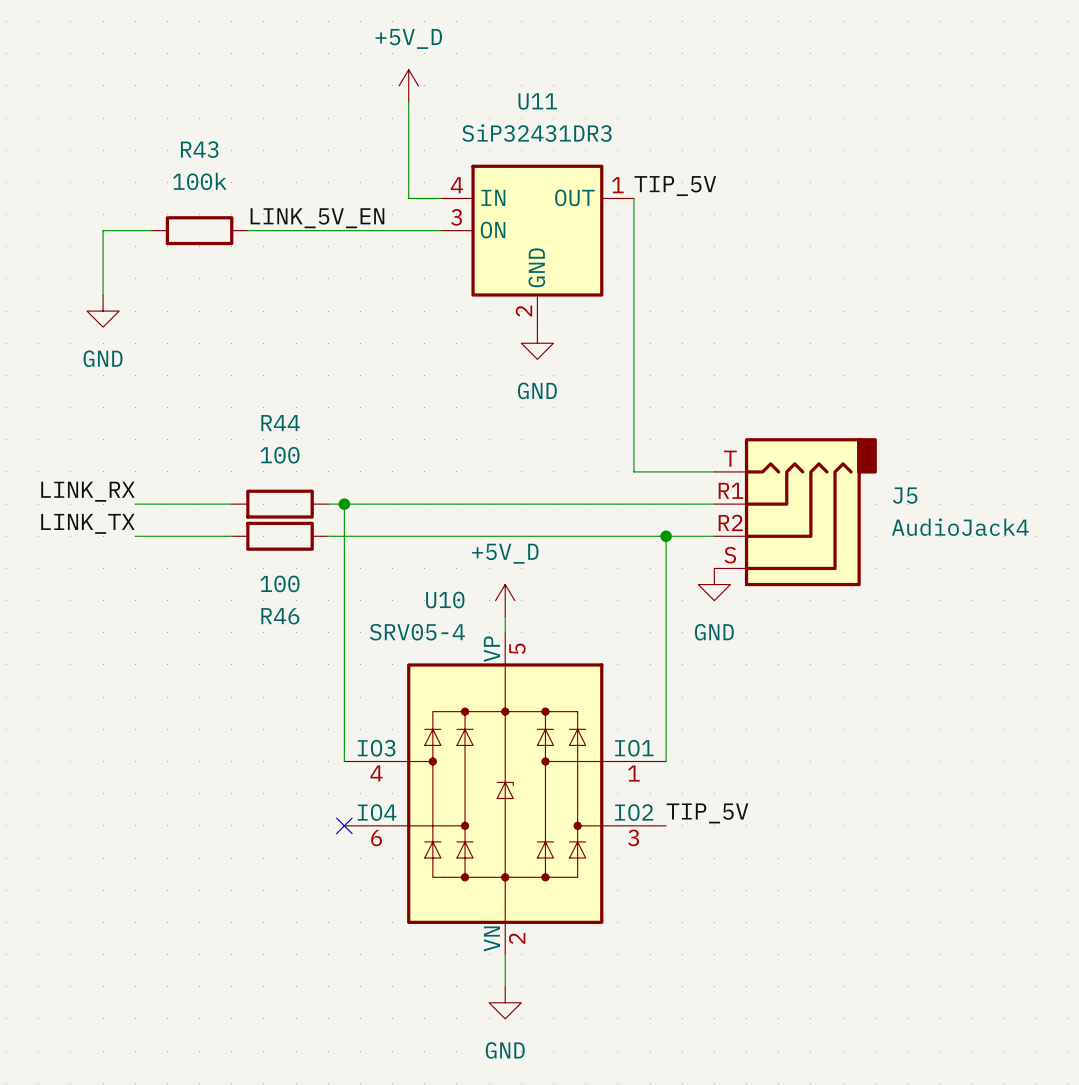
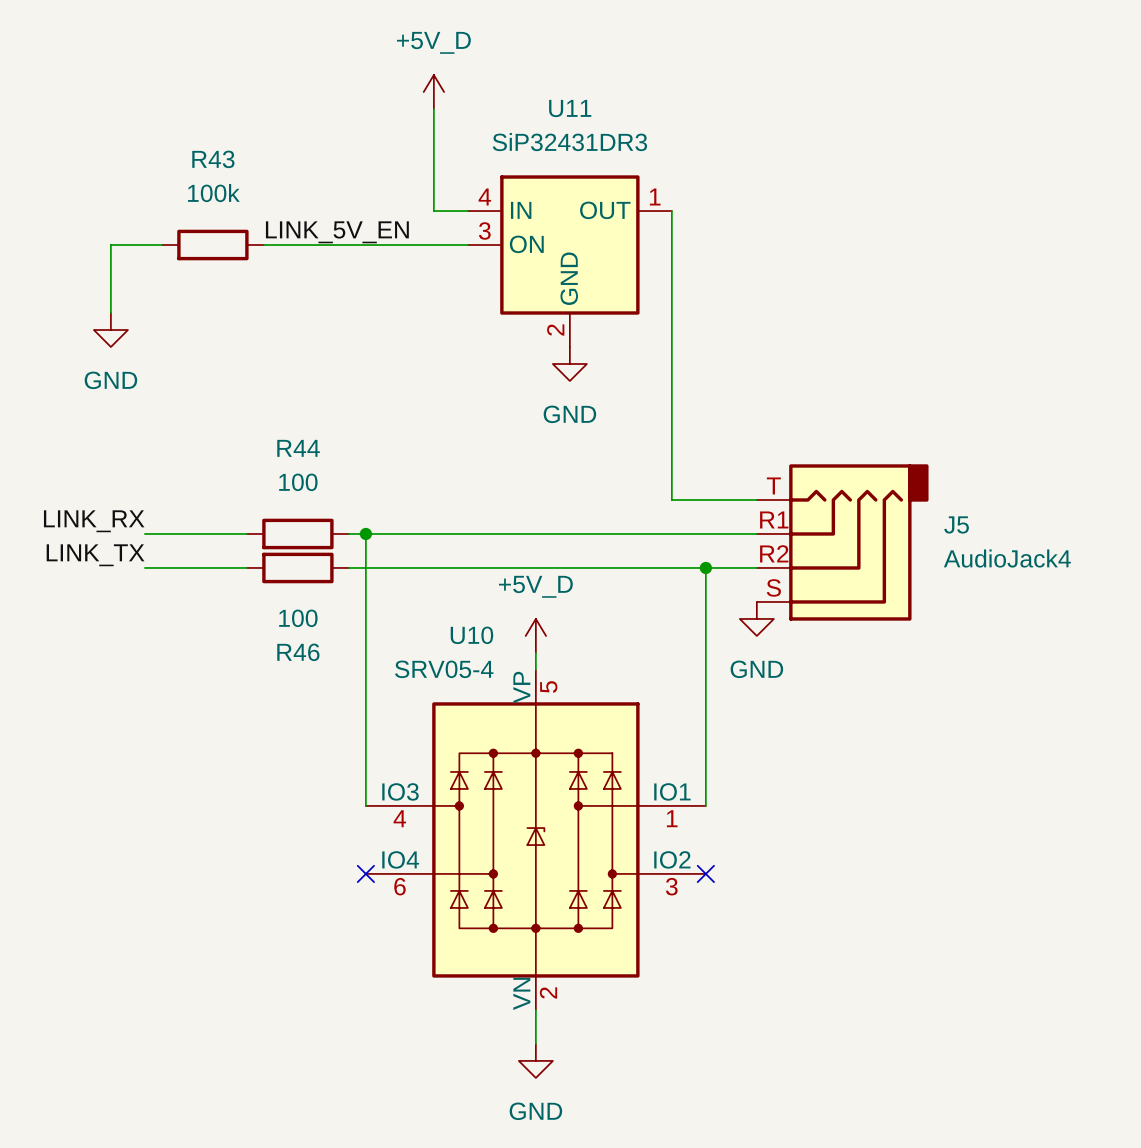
label: TIP_5V (675, 186) -> none
label: TIP_5V (707, 813) -> none
no-connect mark: none -> (705, 873)

